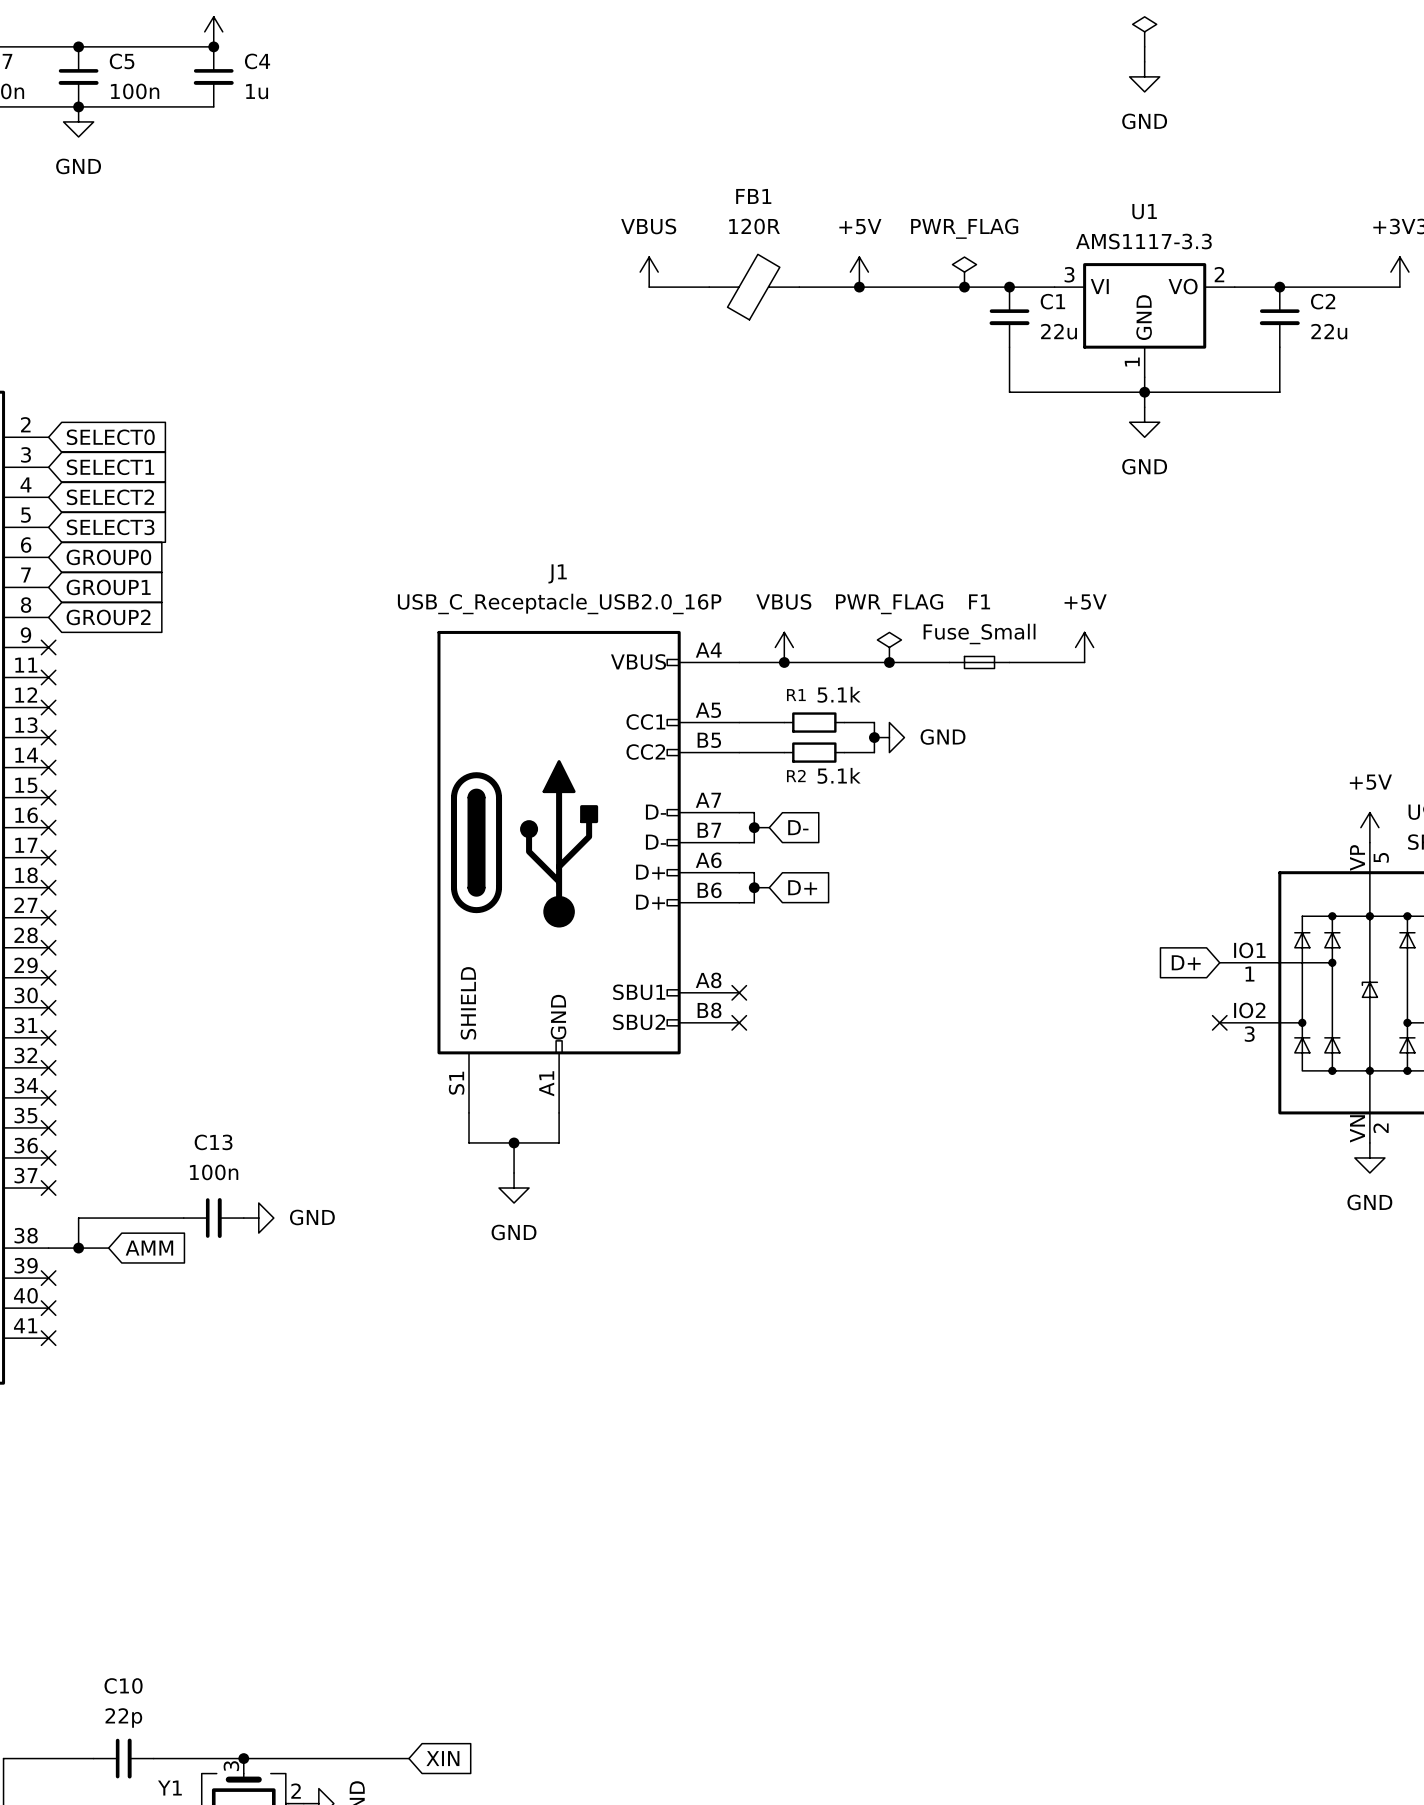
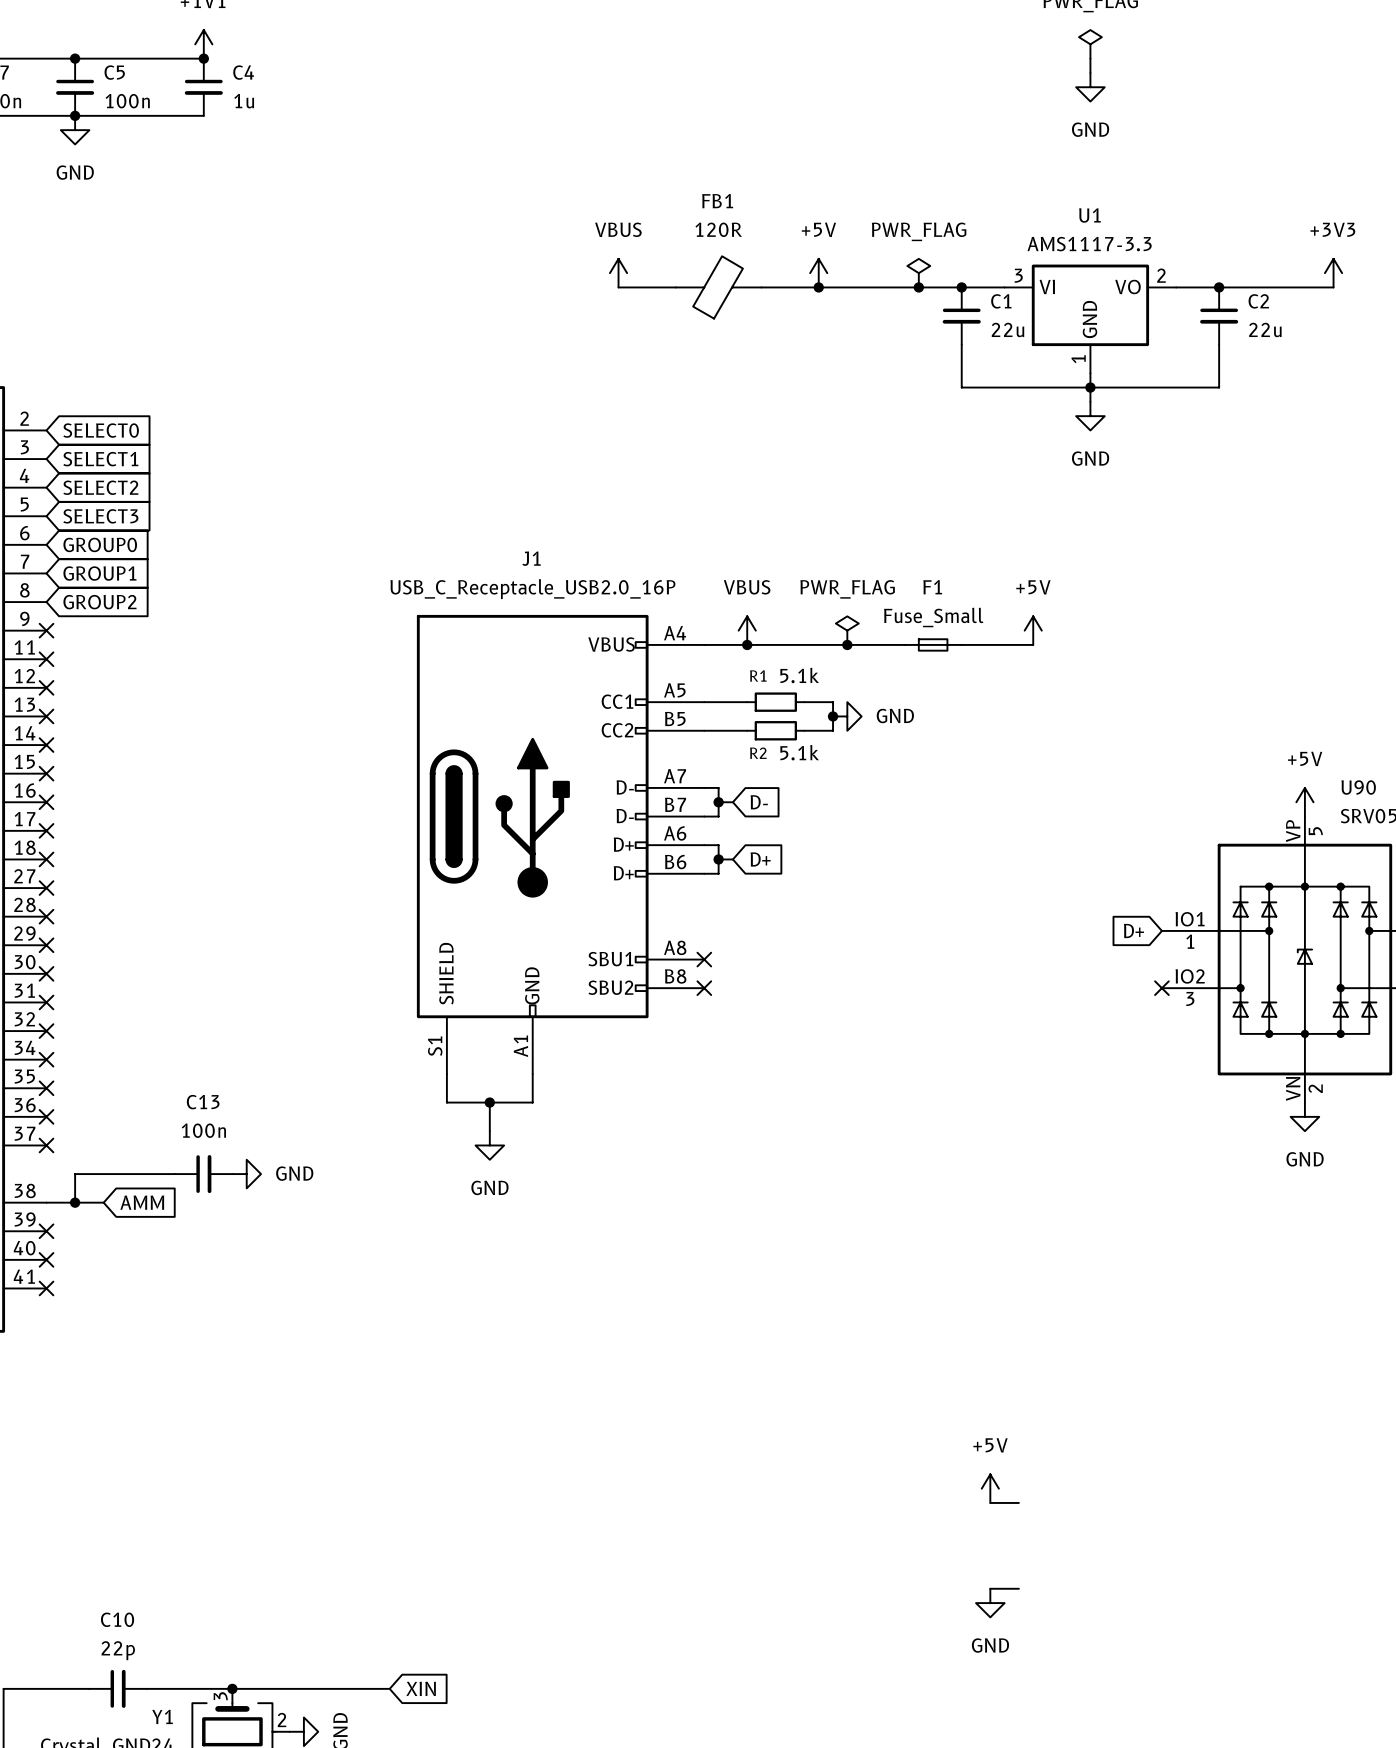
power symbol: none -> +5V (990, 1488)
wire: none -> (990, 1502) (1018, 1502)
wire: none -> (990, 1588) (1018, 1588)
power symbol: none -> GND (990, 1603)

